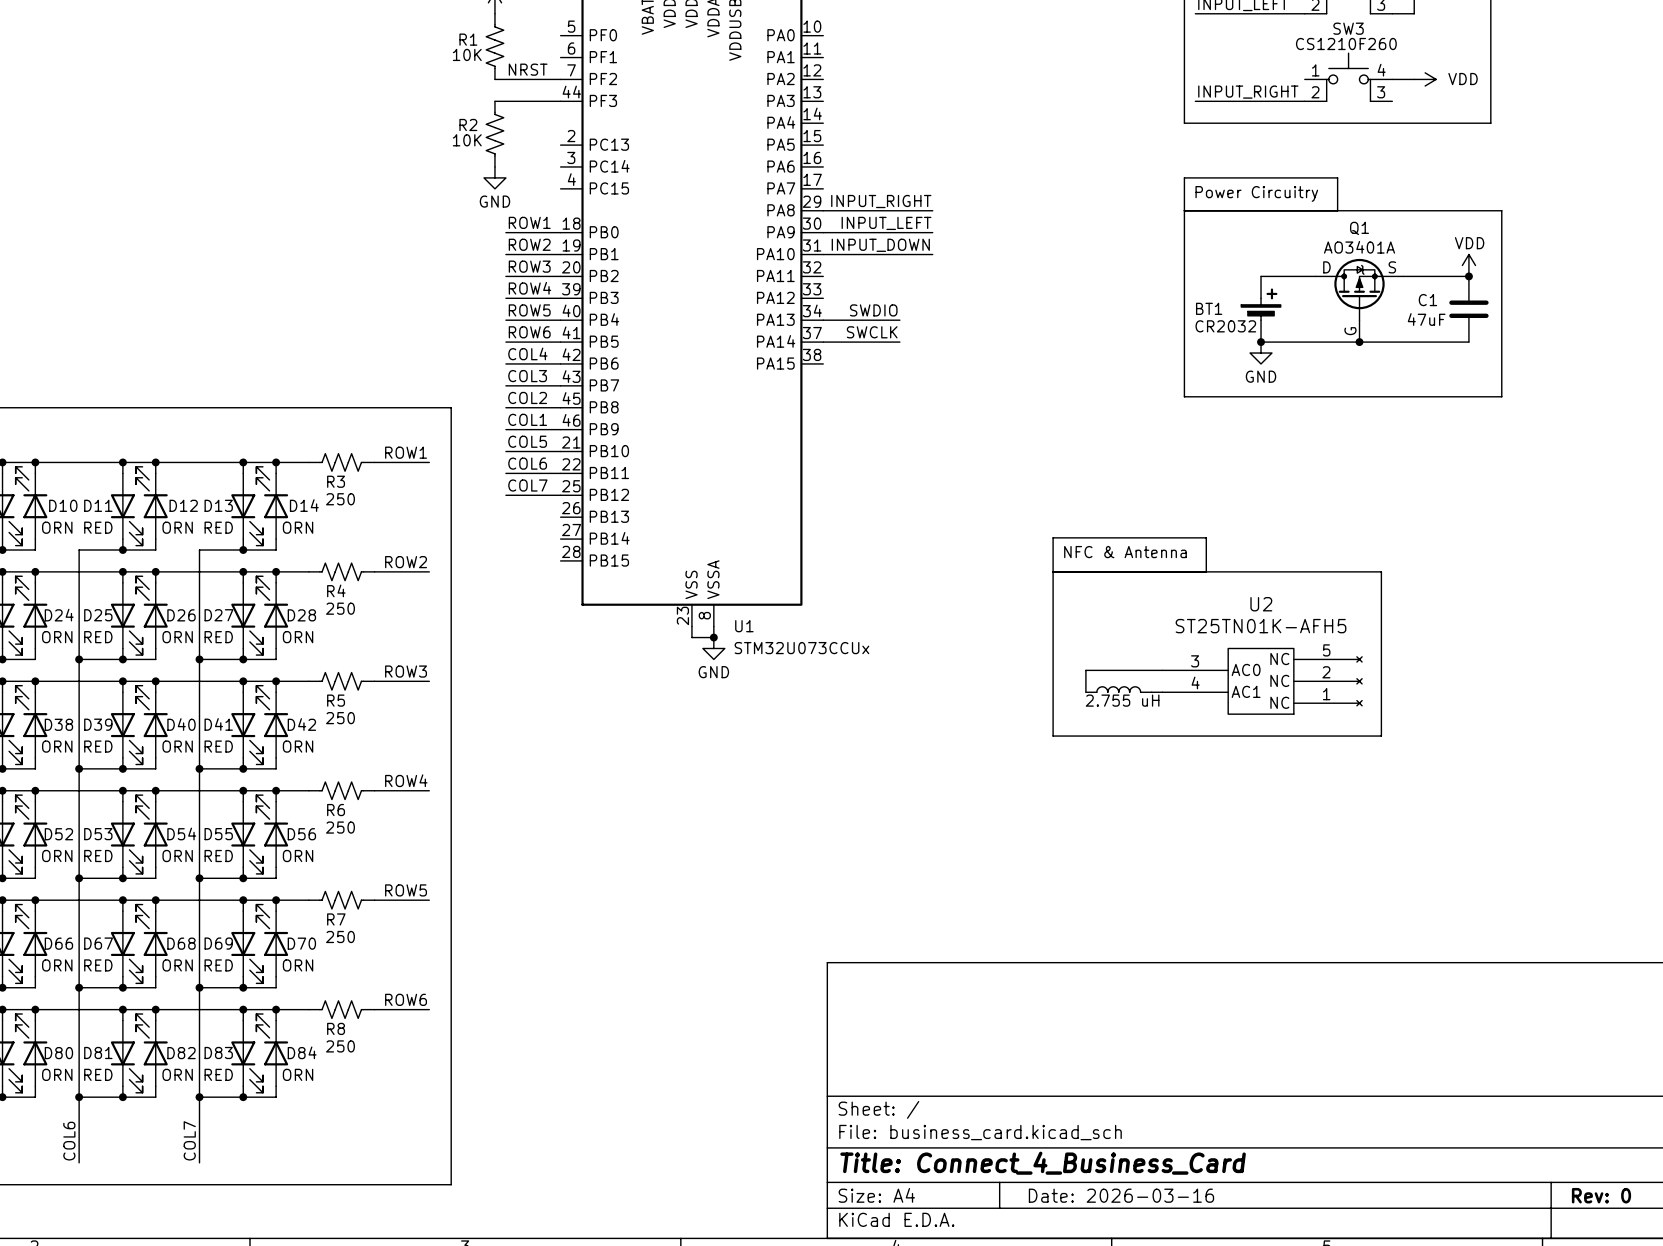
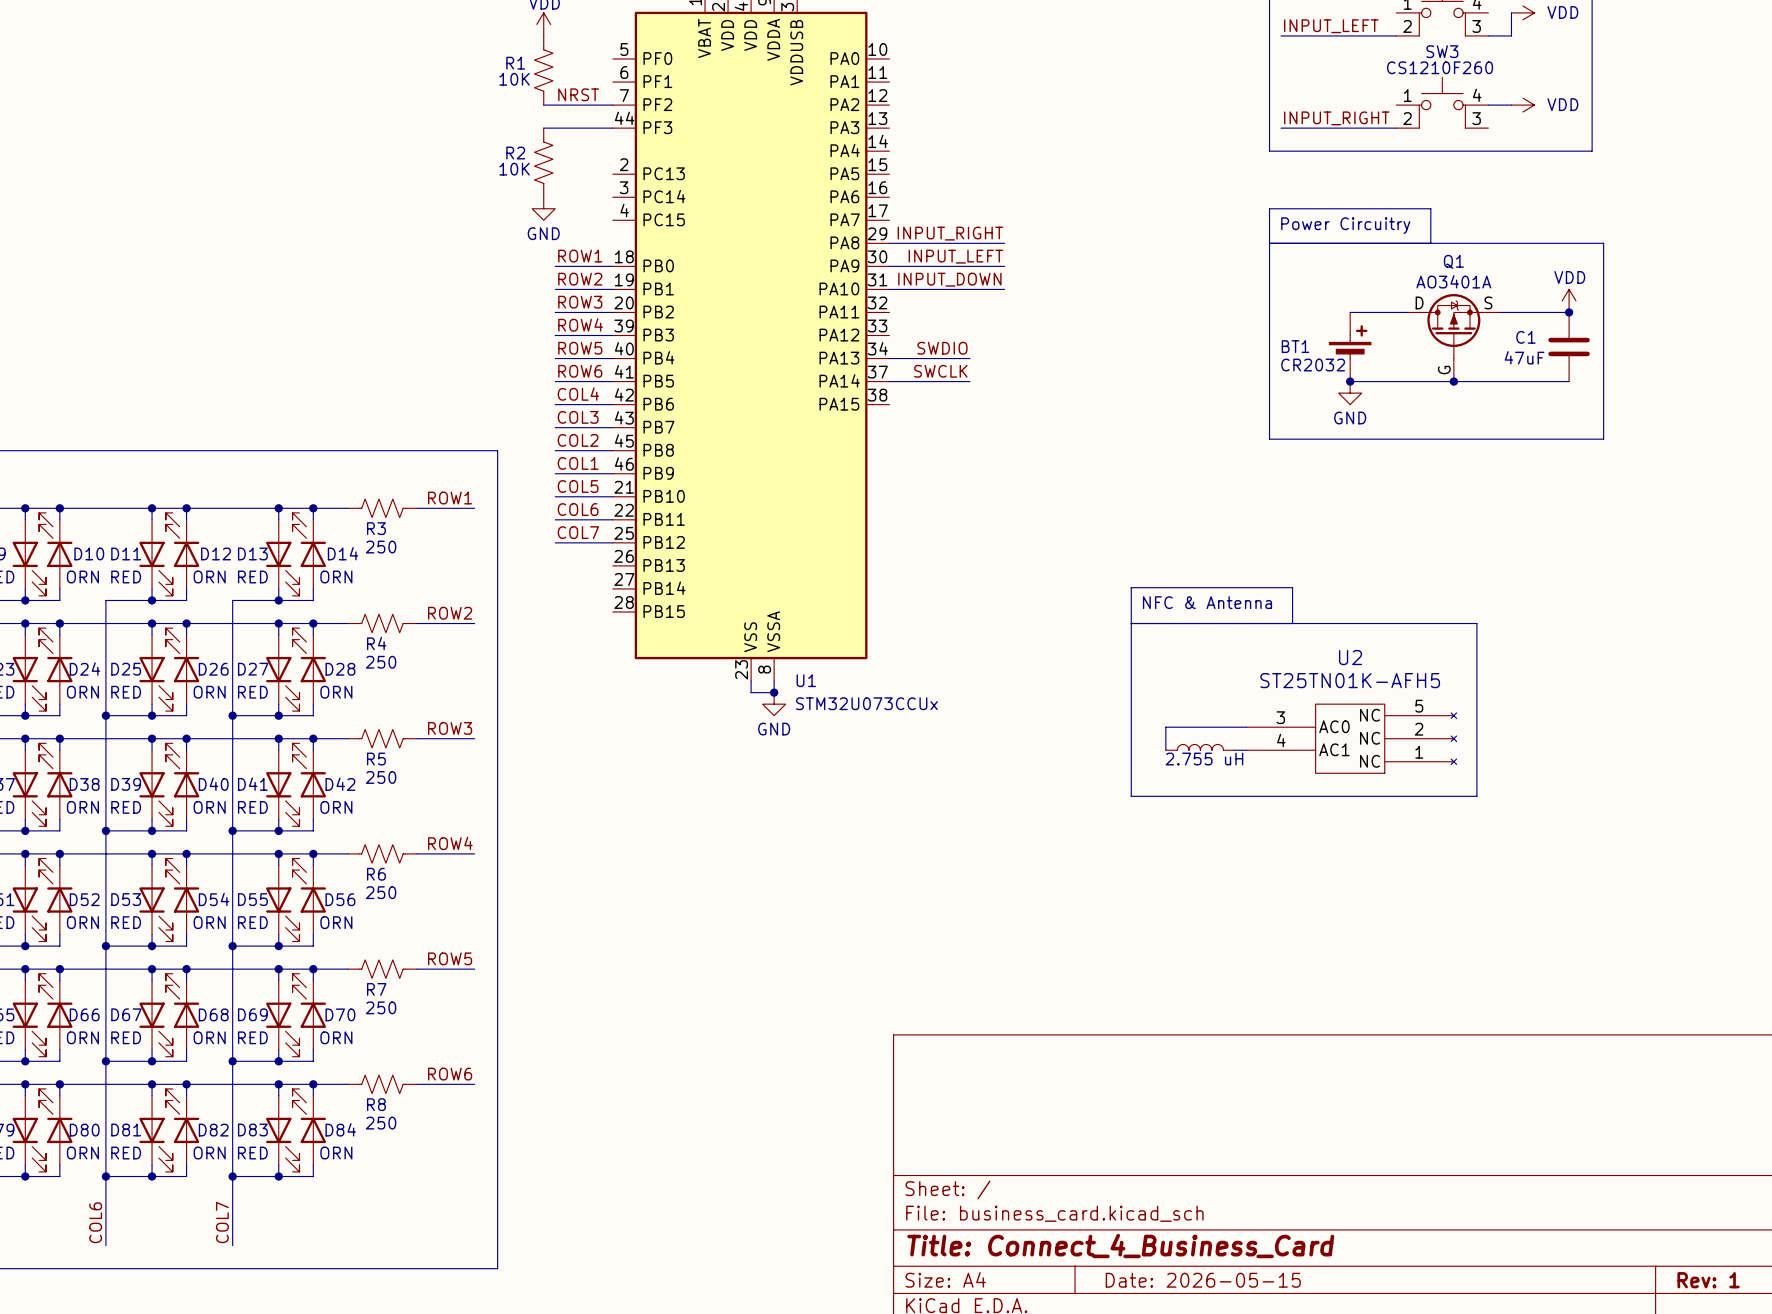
title block: Date: 2026-03-16 (1121, 1195) -> Date: 2026-05-15 (1203, 1280)
title block: Rev: 0 (1601, 1195) -> Rev: 1 (1708, 1280)

